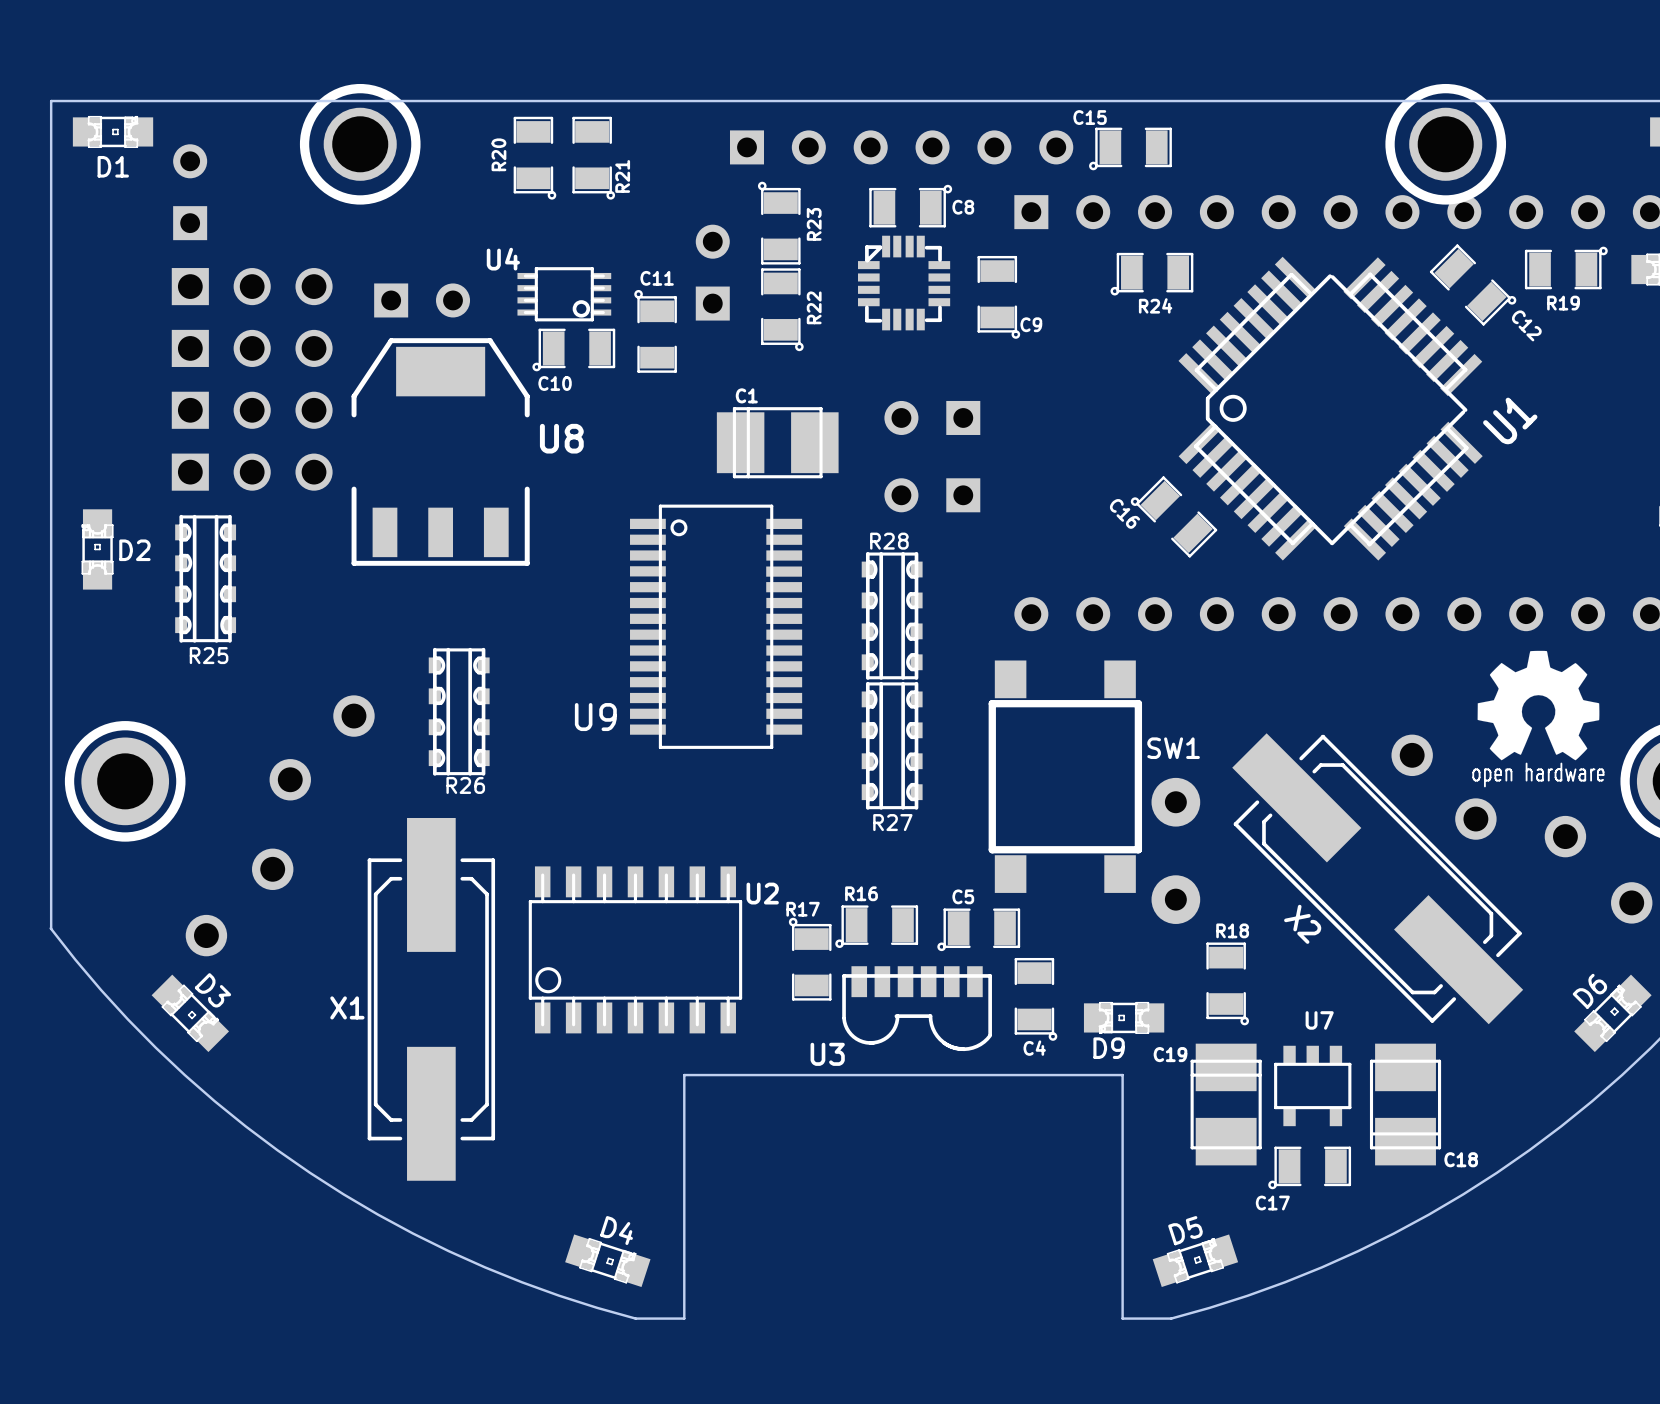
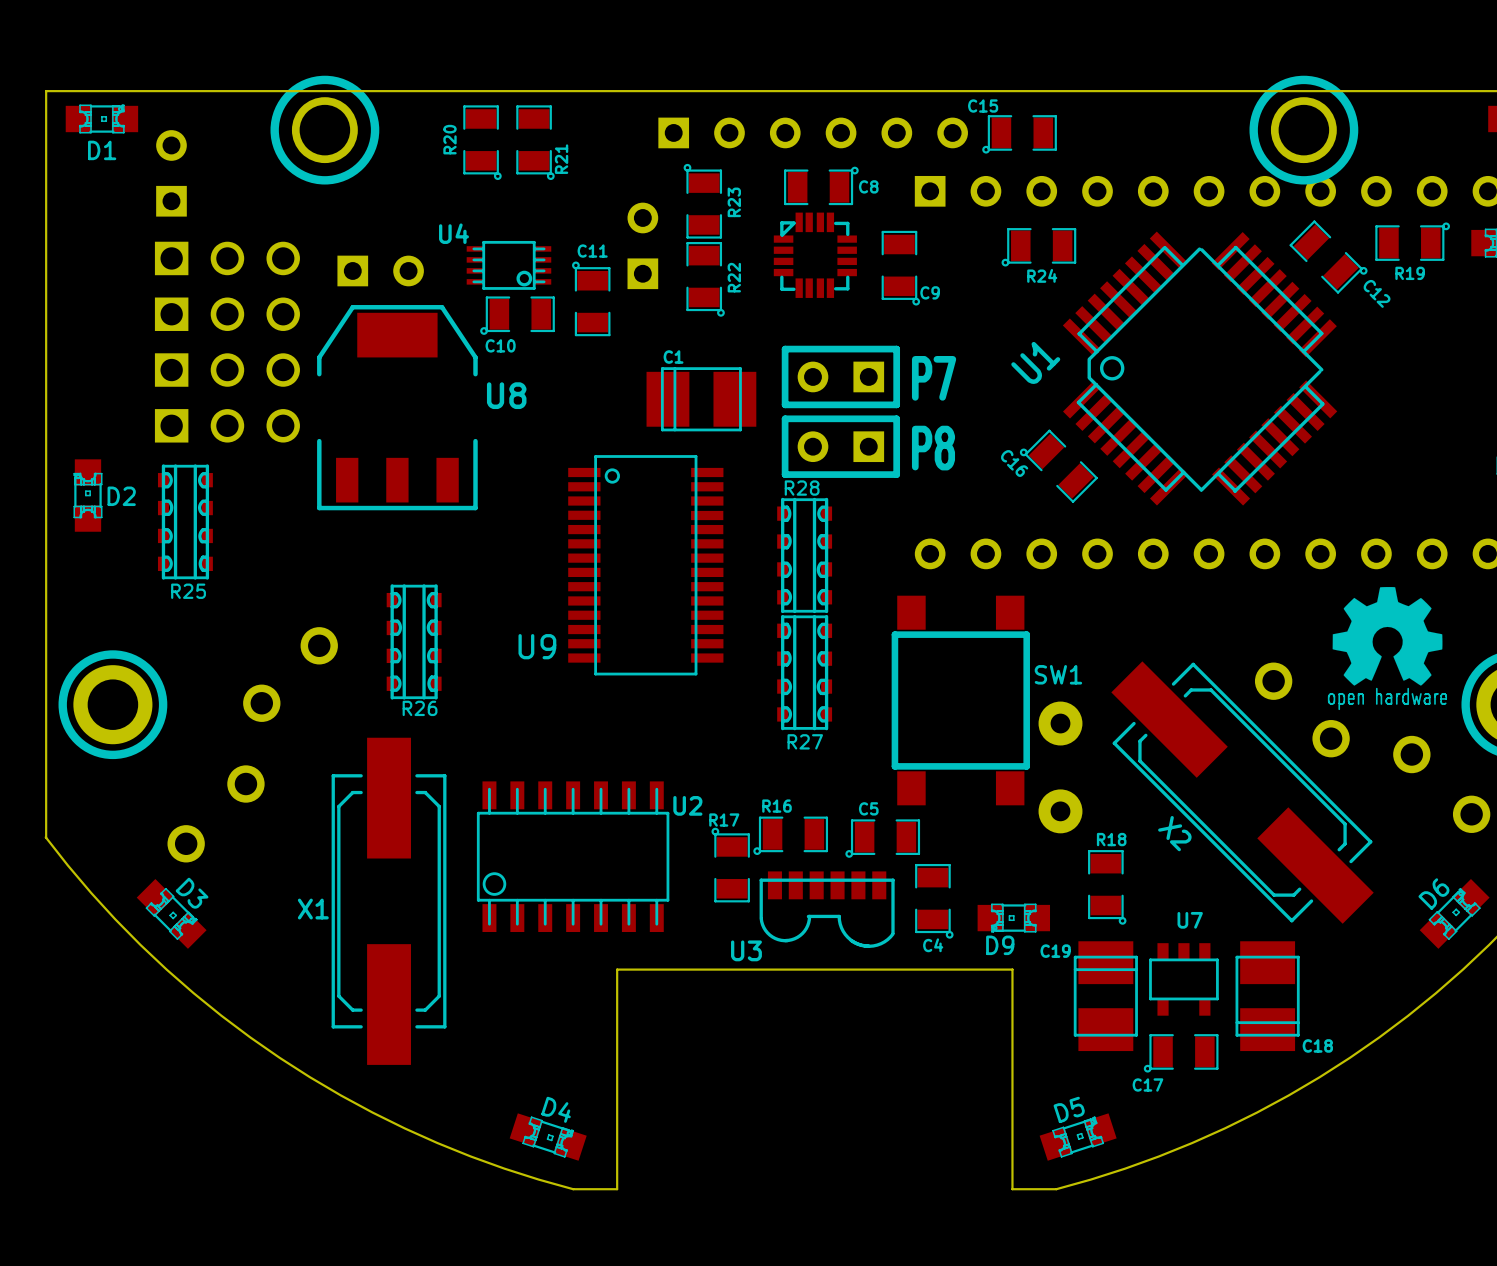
P7 side: bottom (932, 417) -> top (840, 376)
U1 name position: U1 (1510, 420) -> U1 (1035, 362)
P8 side: bottom (932, 495) -> top (840, 446)

